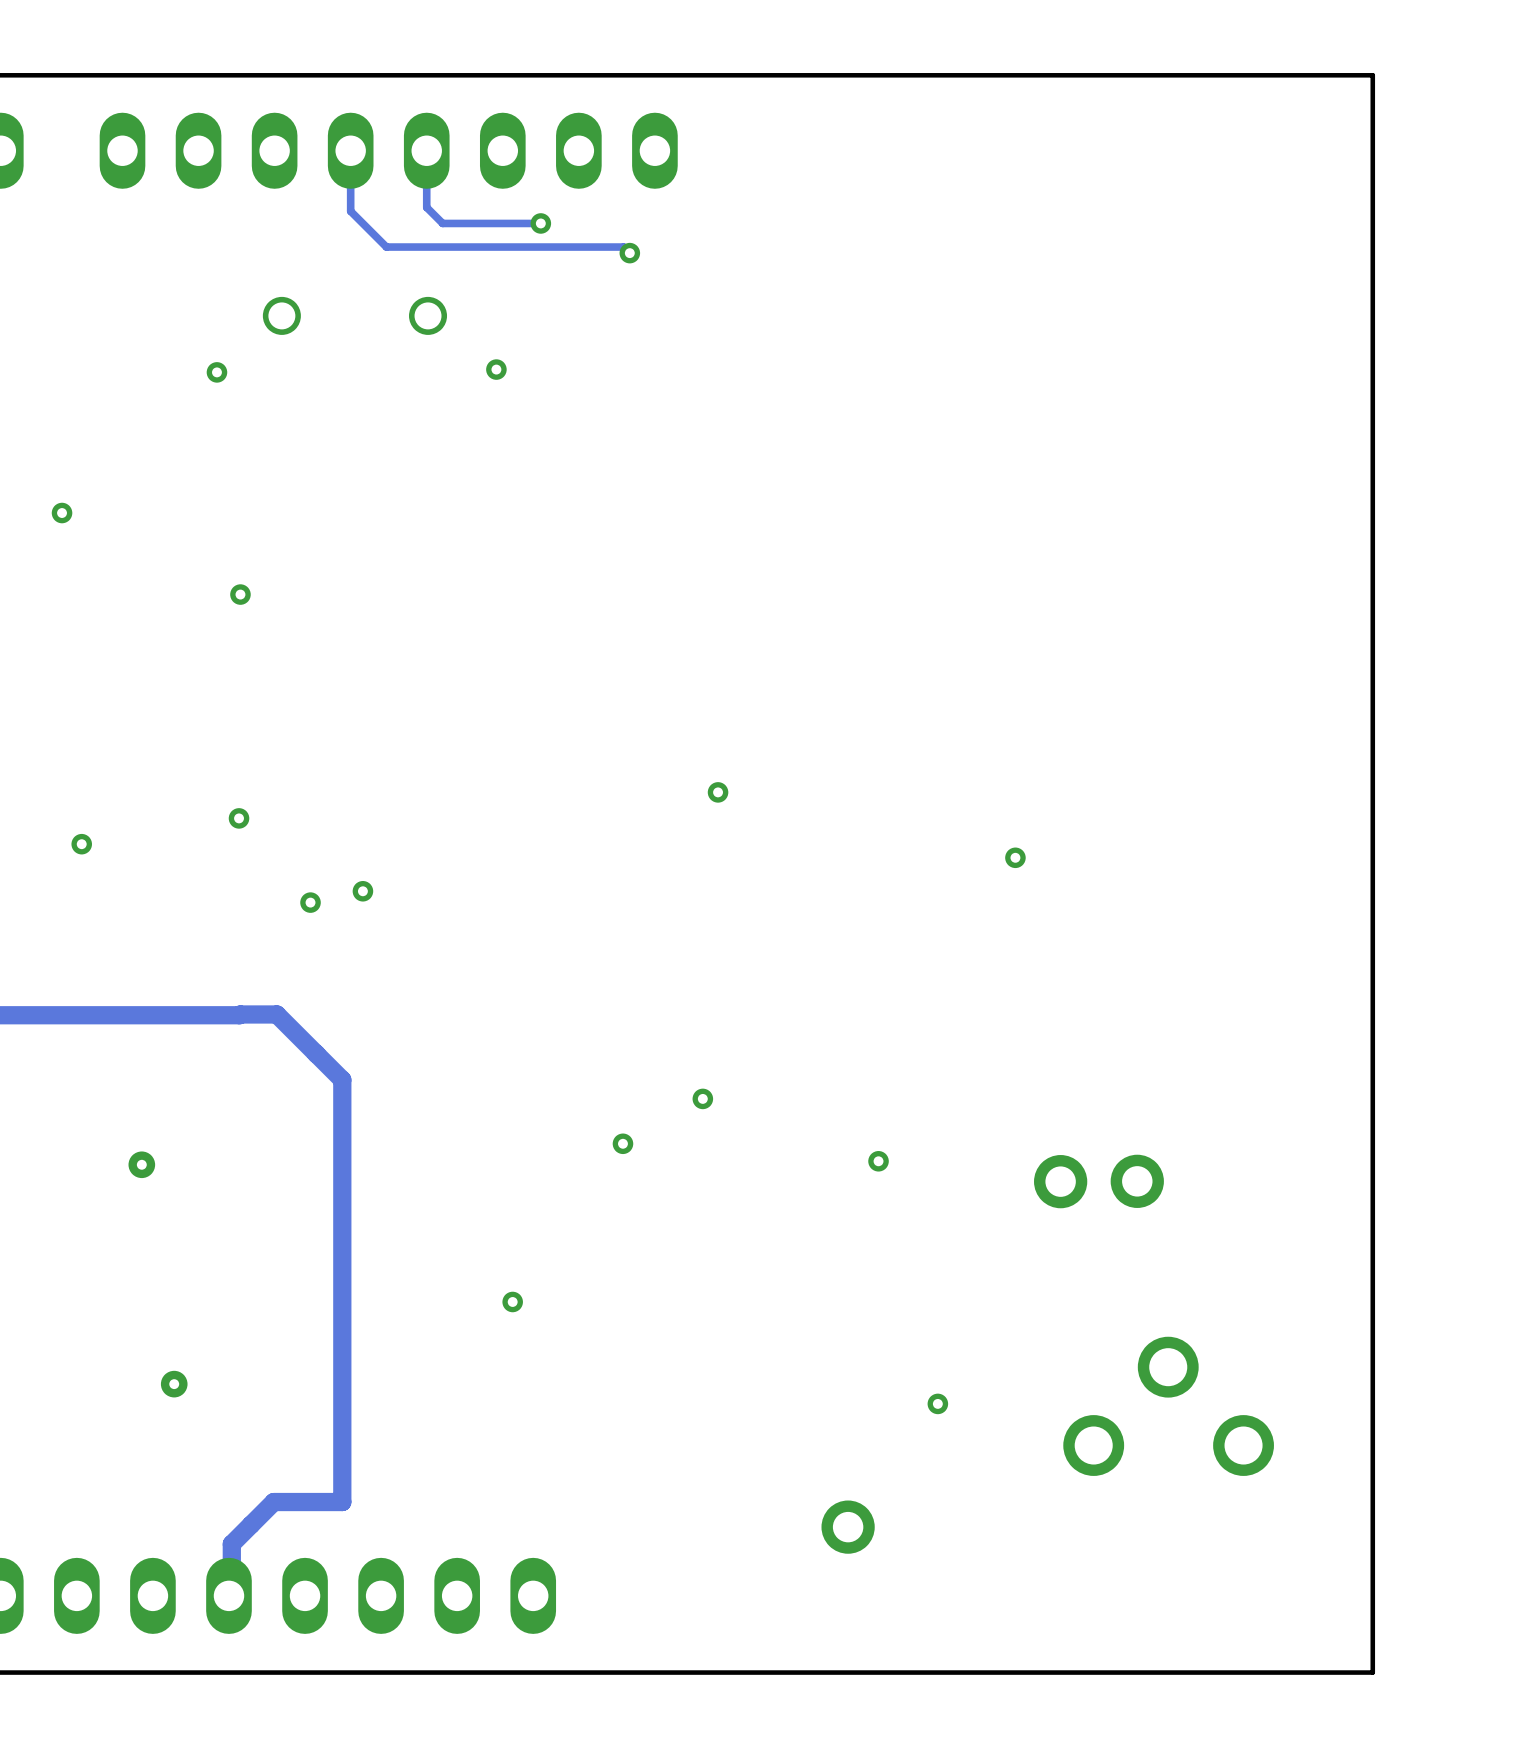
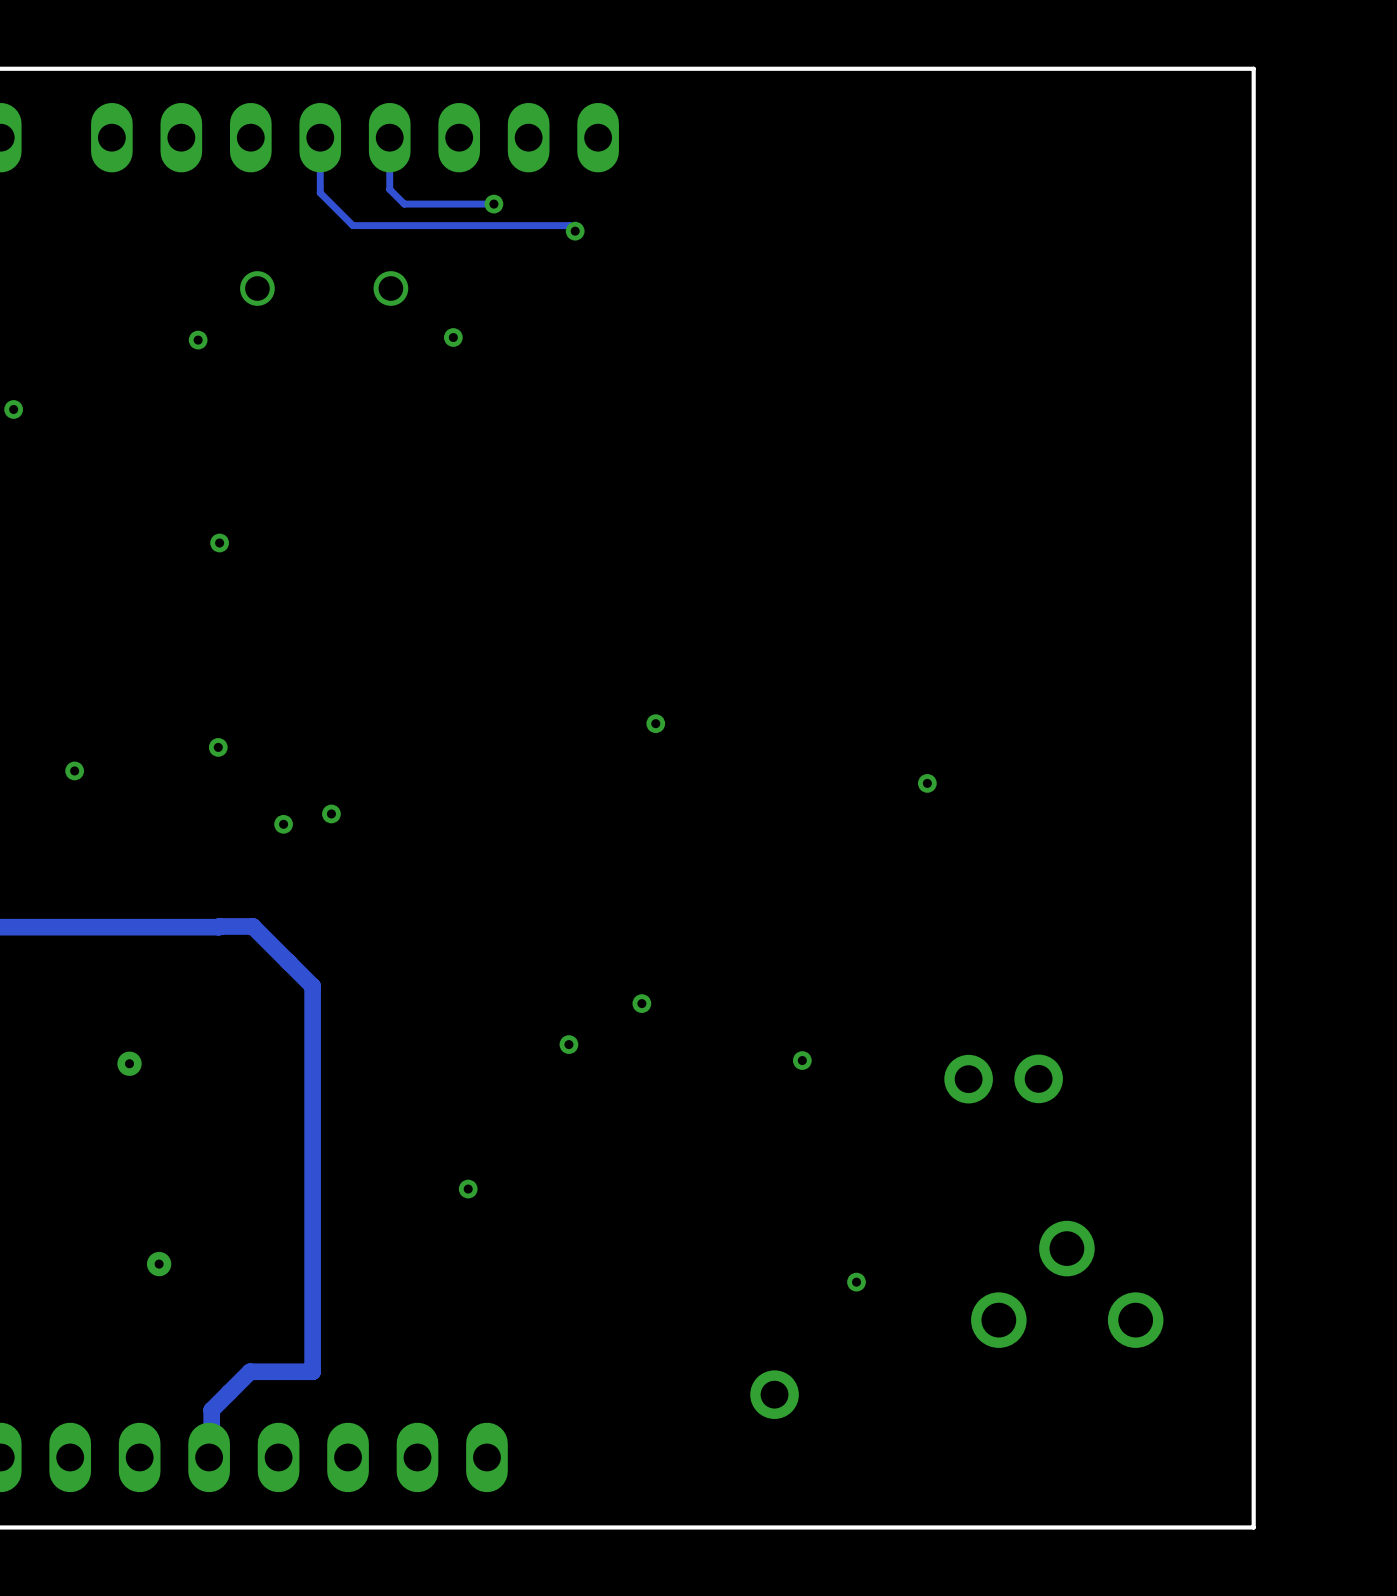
via position: (62, 513) -> (13, 409)

